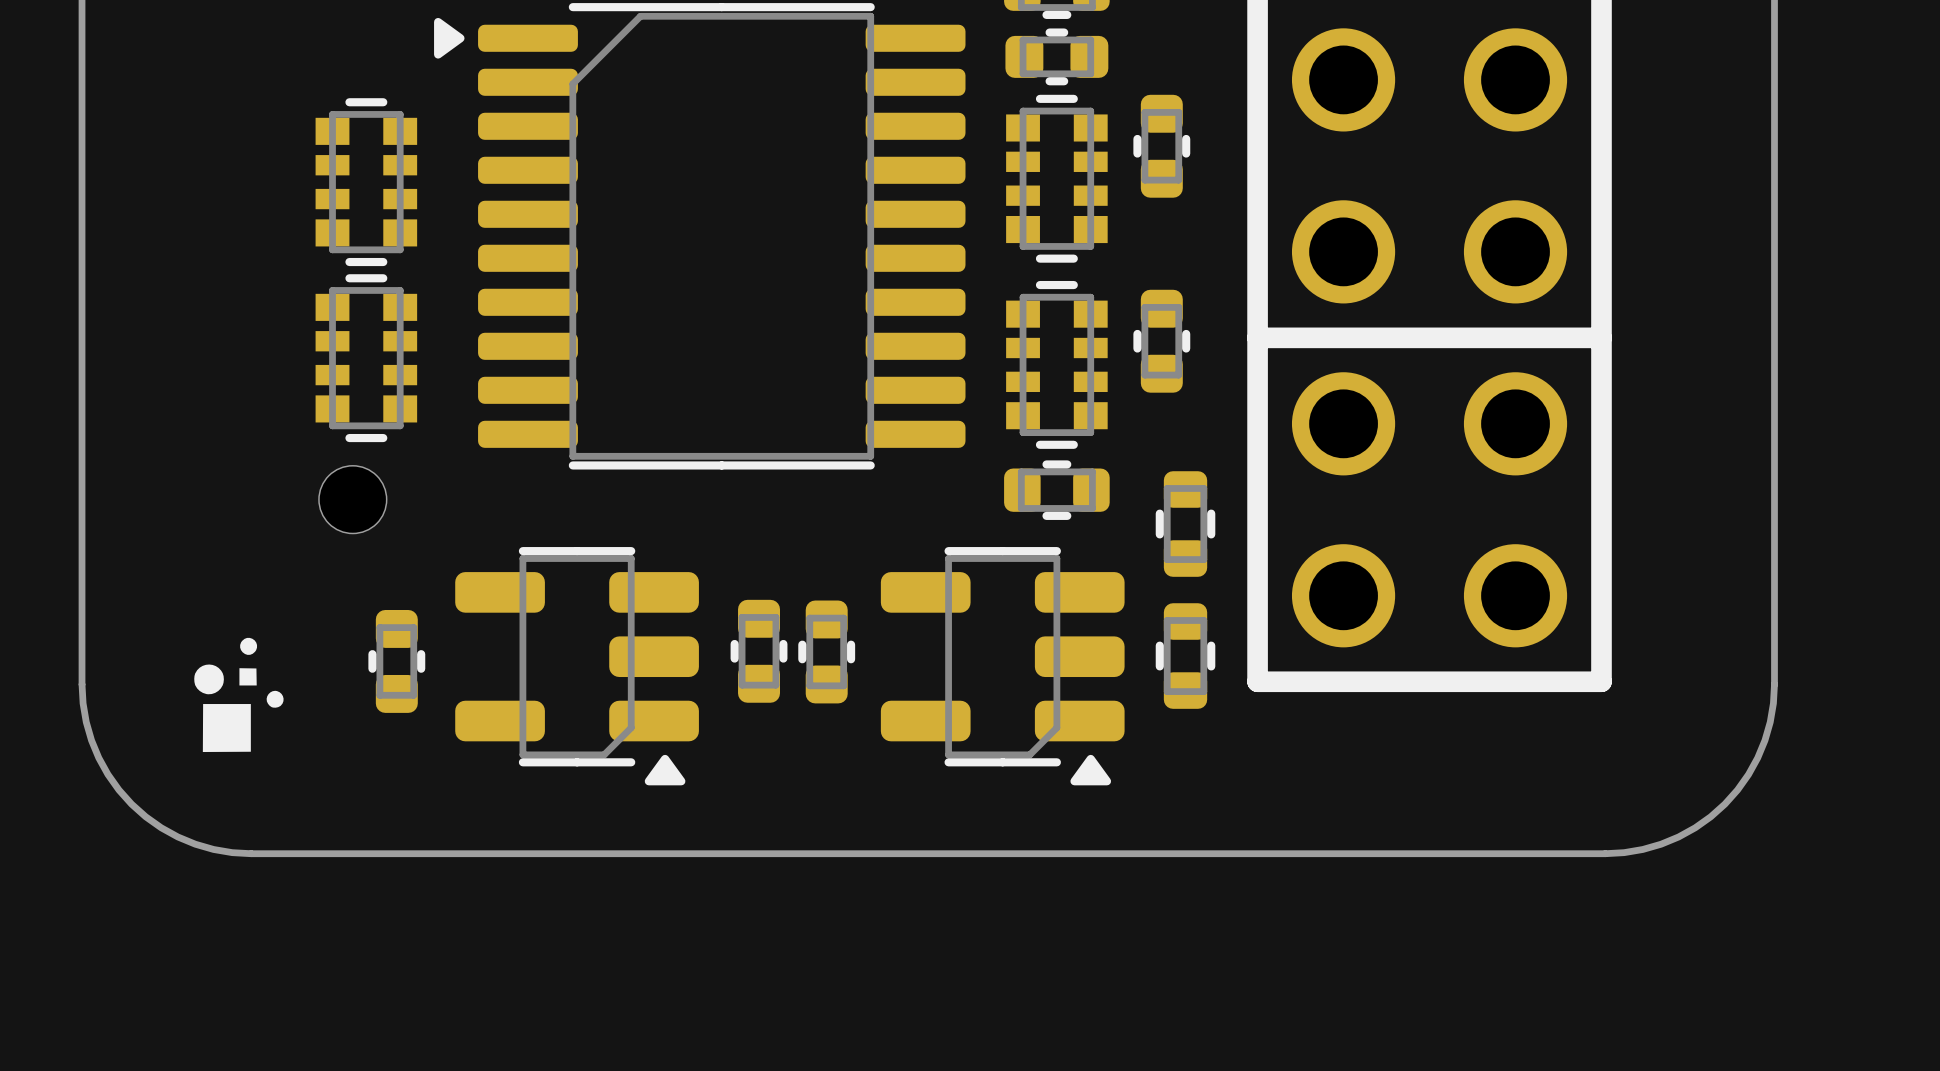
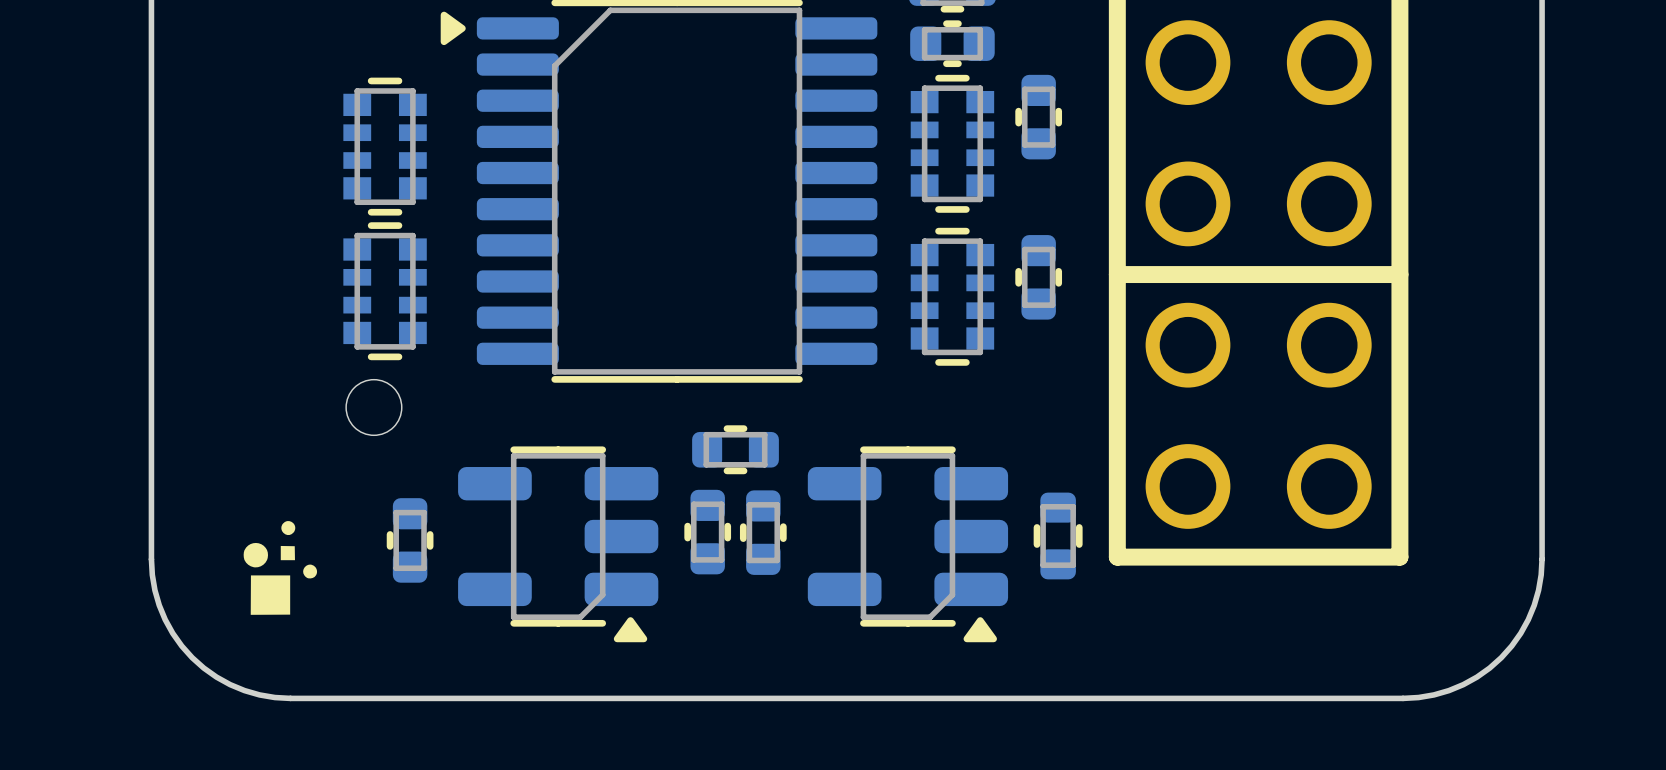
part: (1056, 490) -> none
part: (1185, 524) -> none
part: none -> (735, 449)

